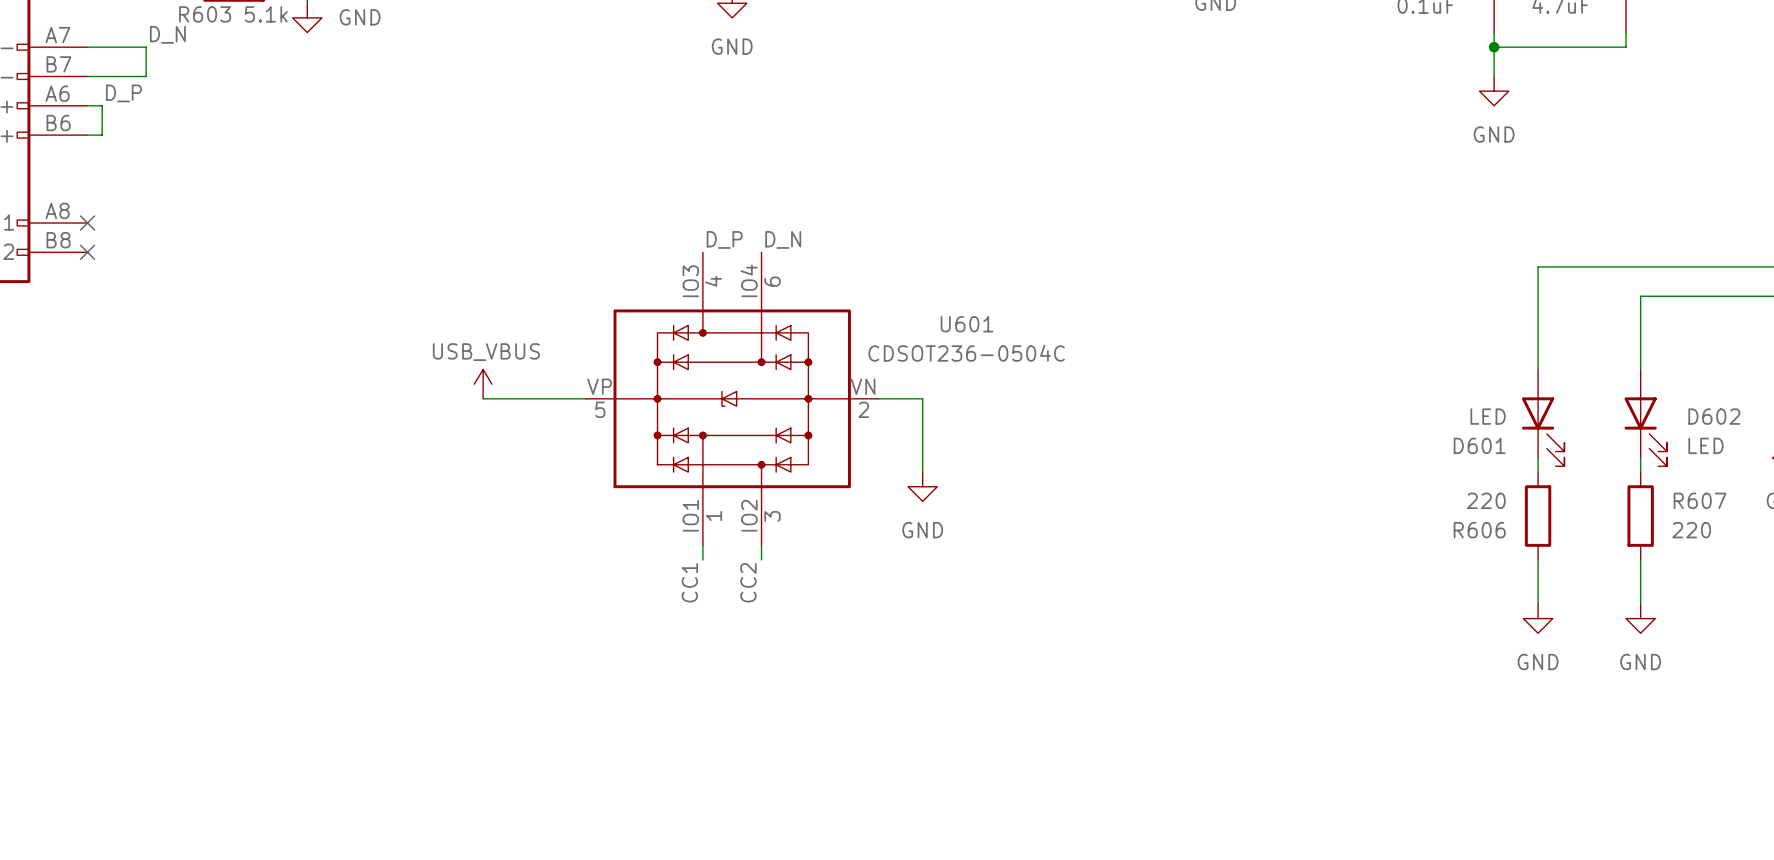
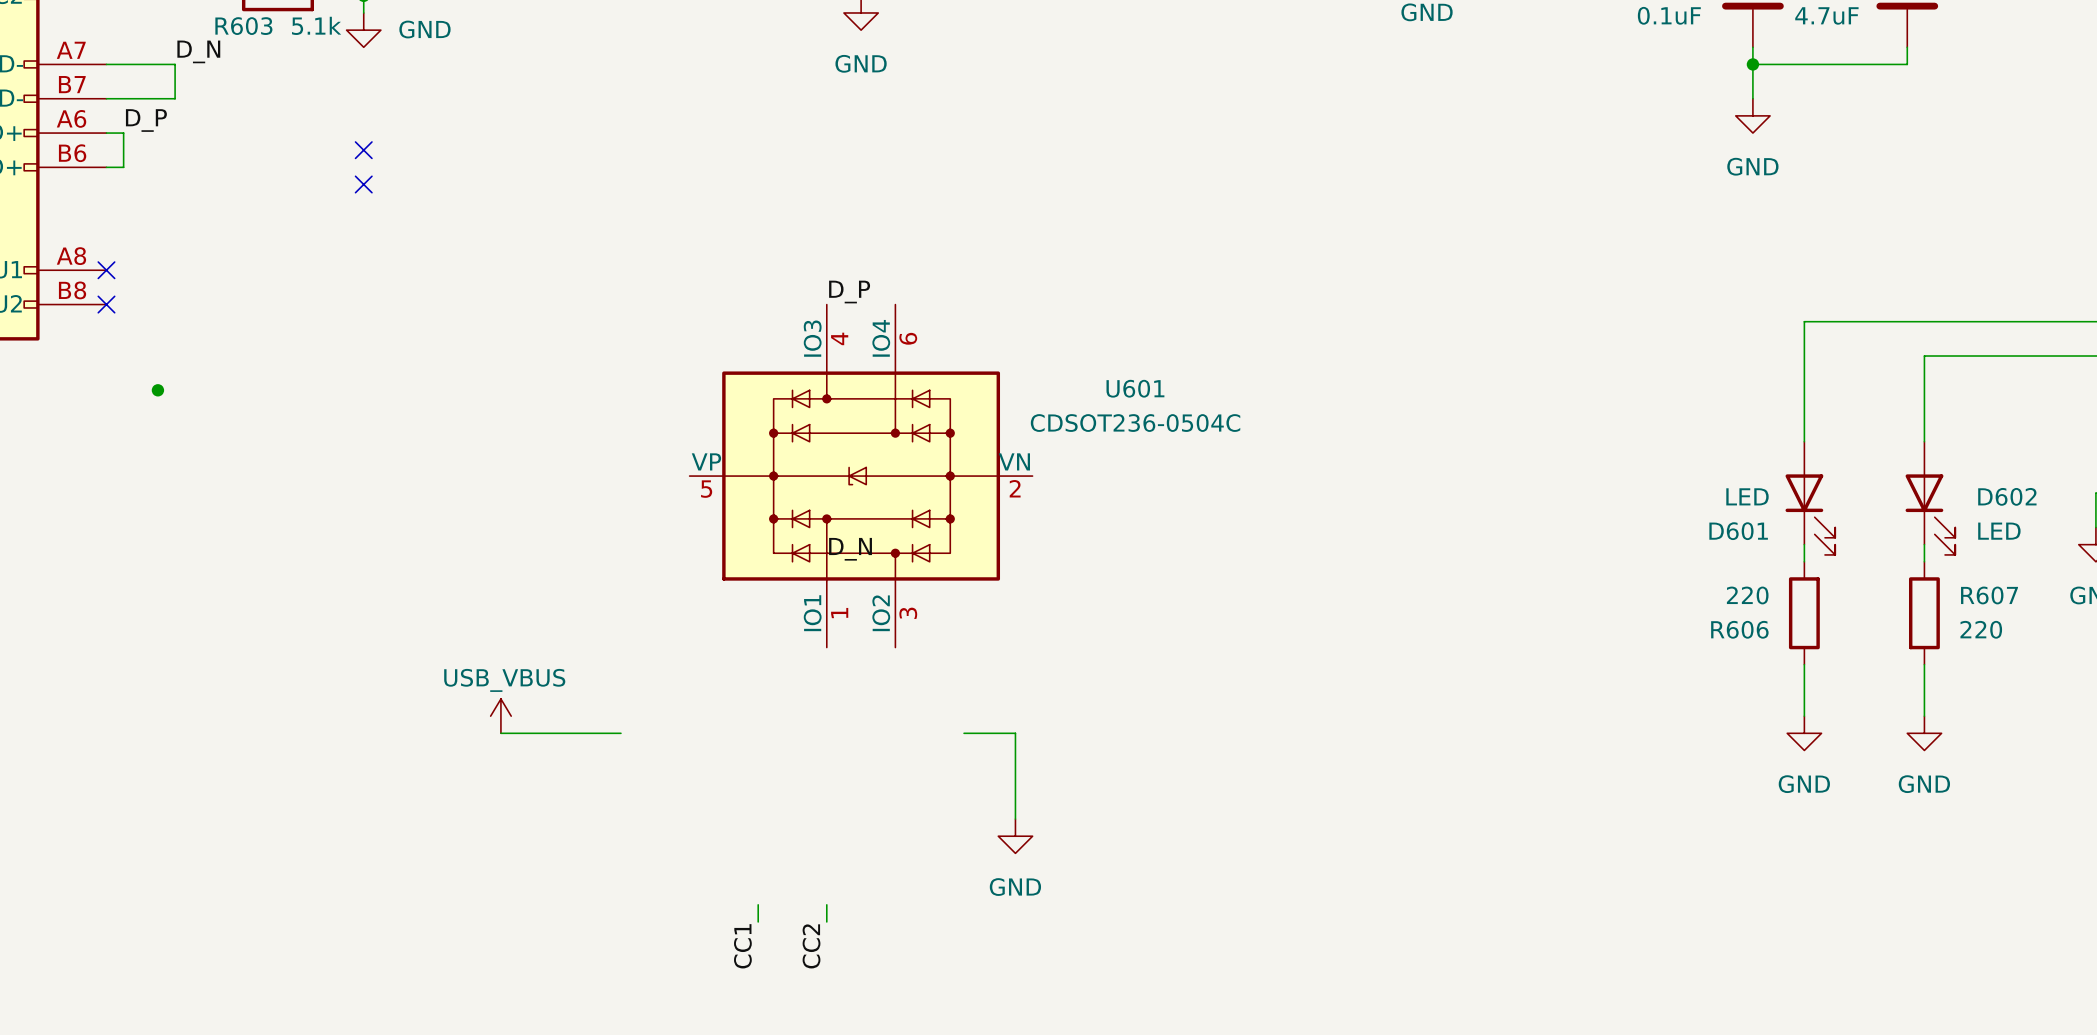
no-connect mark: none -> (363, 150)
no-connect mark: none -> (363, 184)
label position: D_N (783, 239) -> D_N (850, 549)
junction: none -> (157, 390)
power symbol position: USB_VBUS (483, 384) -> USB_VBUS (500, 716)
wire: (483, 398) (585, 398) -> (500, 733) (620, 733)
wire: (878, 398) (922, 398) (922, 472) -> (964, 733) (1015, 733) (1015, 819)
power symbol position: GND (922, 486) -> GND (1015, 836)
wire: (702, 545) (702, 559) -> (758, 904) (758, 921)
wire: (761, 545) (761, 559) -> (826, 904) (826, 921)
label position: CC1 (689, 582) -> CC1 (742, 946)
label position: CC2 (748, 582) -> CC2 (811, 946)

